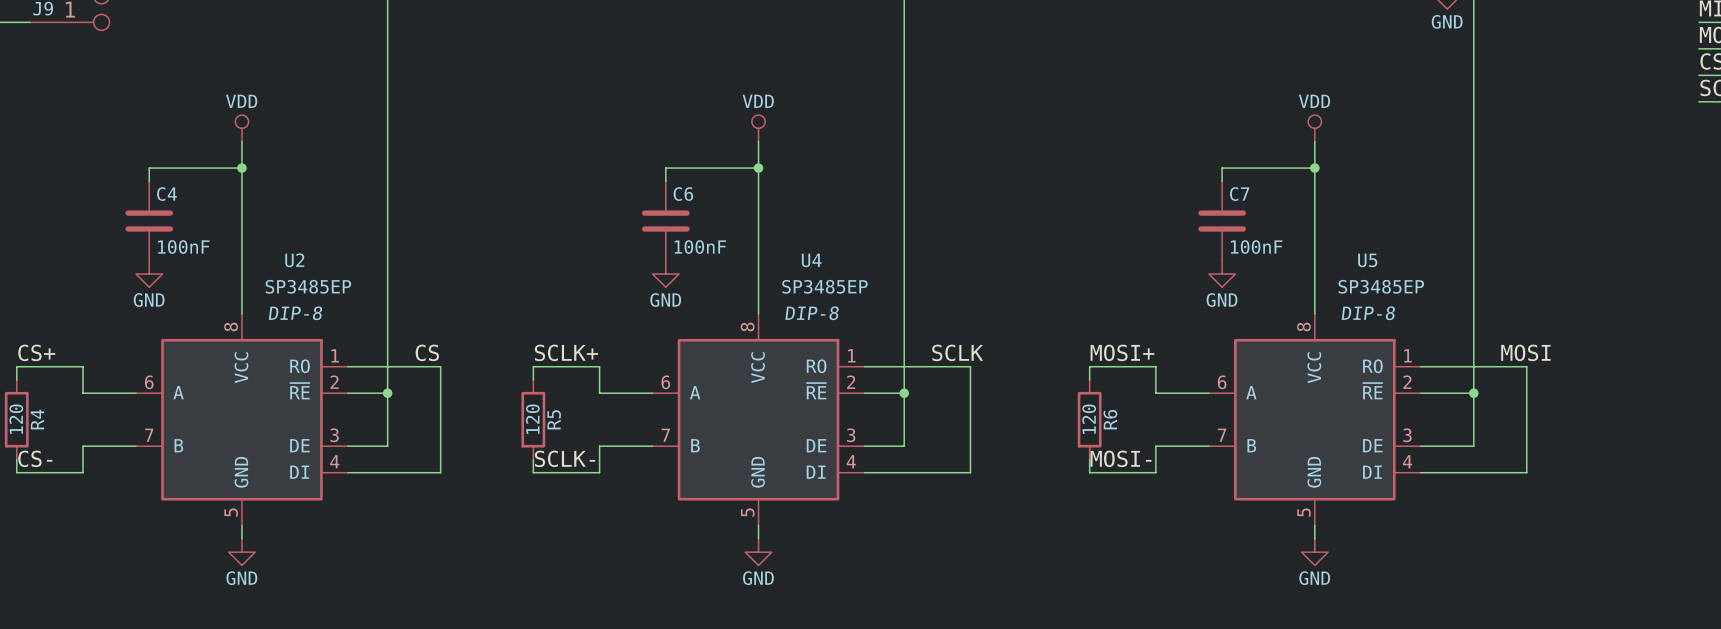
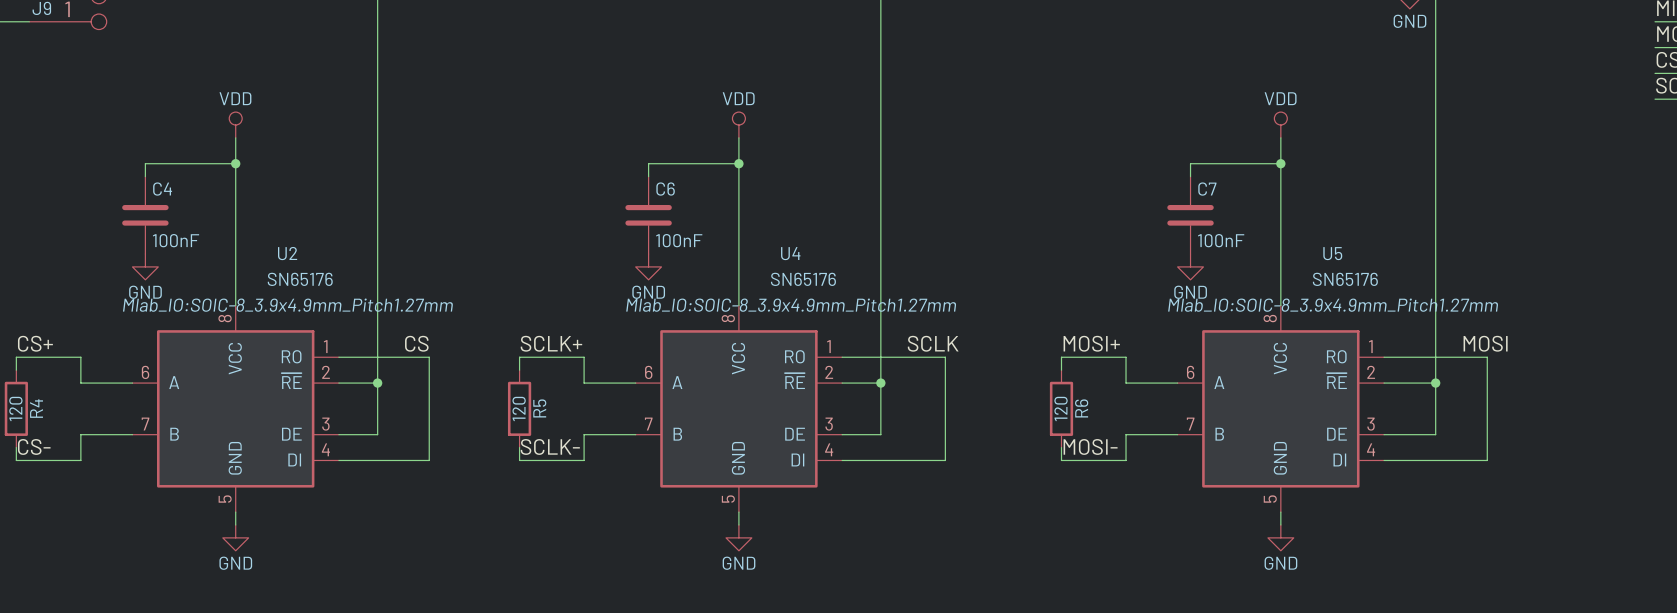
U2 value: SP3485EP (308, 286) -> SN65176 (300, 279)
U4 value: SP3485EP (824, 286) -> SN65176 (803, 279)
U5 value: SP3485EP (1381, 286) -> SN65176 (1345, 279)
U2 text: DIP-8 (295, 313) -> Mlab_IO:SOIC-8_3.9x4.9mm_Pitch1.27mm (288, 305)
U4 text: DIP-8 (812, 313) -> Mlab_IO:SOIC-8_3.9x4.9mm_Pitch1.27mm (791, 305)
U5 text: DIP-8 (1368, 313) -> Mlab_IO:SOIC-8_3.9x4.9mm_Pitch1.27mm (1333, 305)

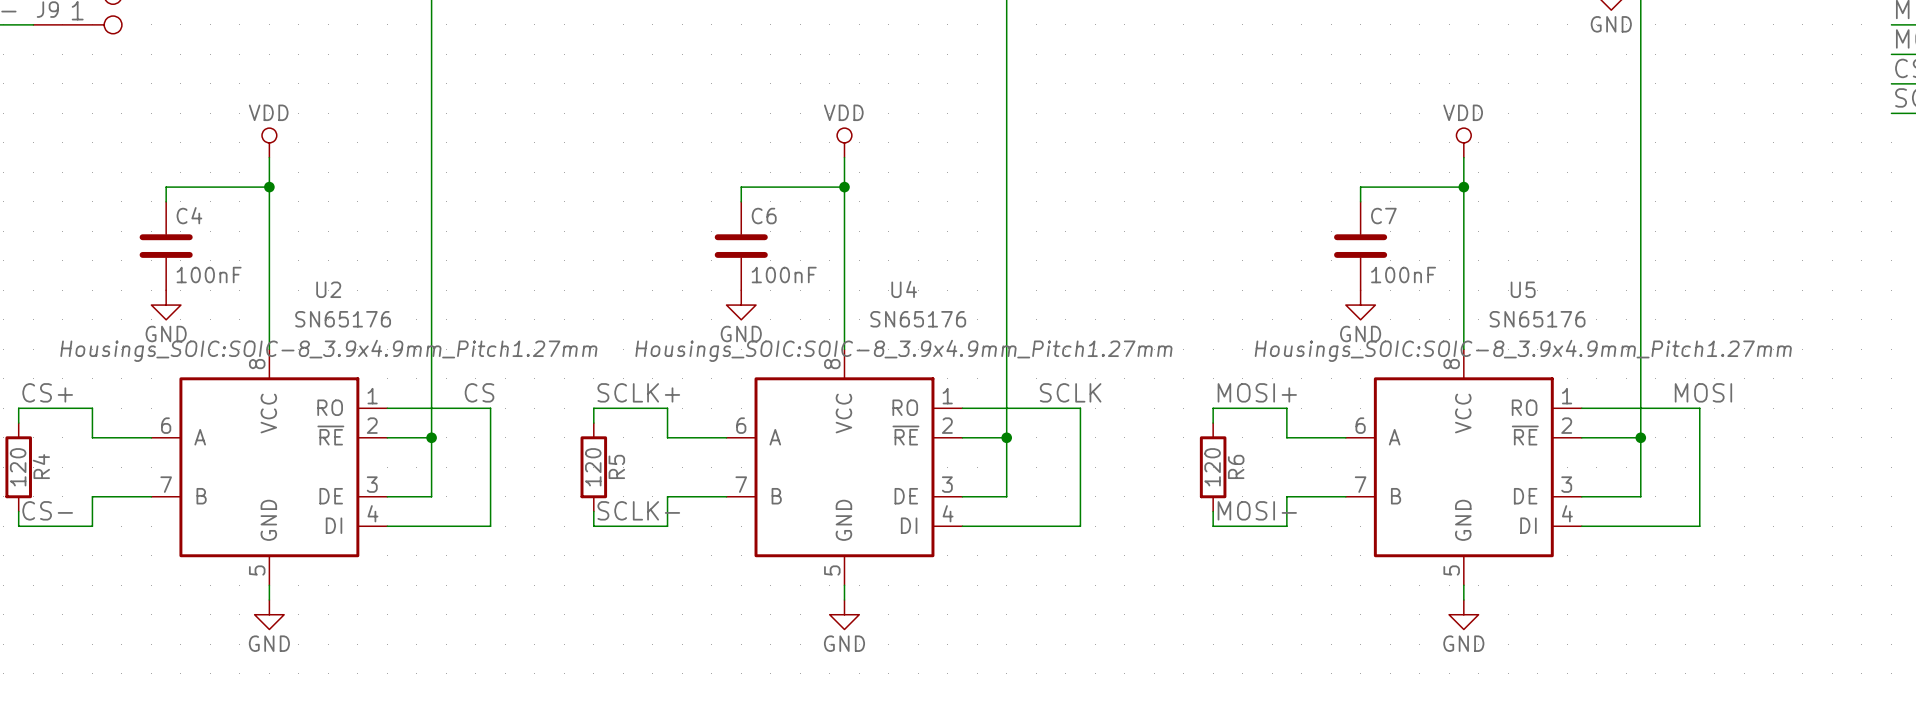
U2 text: Mlab_IO:SOIC-8_3.9x4.9mm_Pitch1.27mm (288, 305) -> Housings_SOIC:SOIC-8_3.9x4.9mm_Pitch1.27mm (328, 350)
U4 text: Mlab_IO:SOIC-8_3.9x4.9mm_Pitch1.27mm (791, 305) -> Housings_SOIC:SOIC-8_3.9x4.9mm_Pitch1.27mm (903, 350)
U5 text: Mlab_IO:SOIC-8_3.9x4.9mm_Pitch1.27mm (1333, 305) -> Housings_SOIC:SOIC-8_3.9x4.9mm_Pitch1.27mm (1523, 350)

